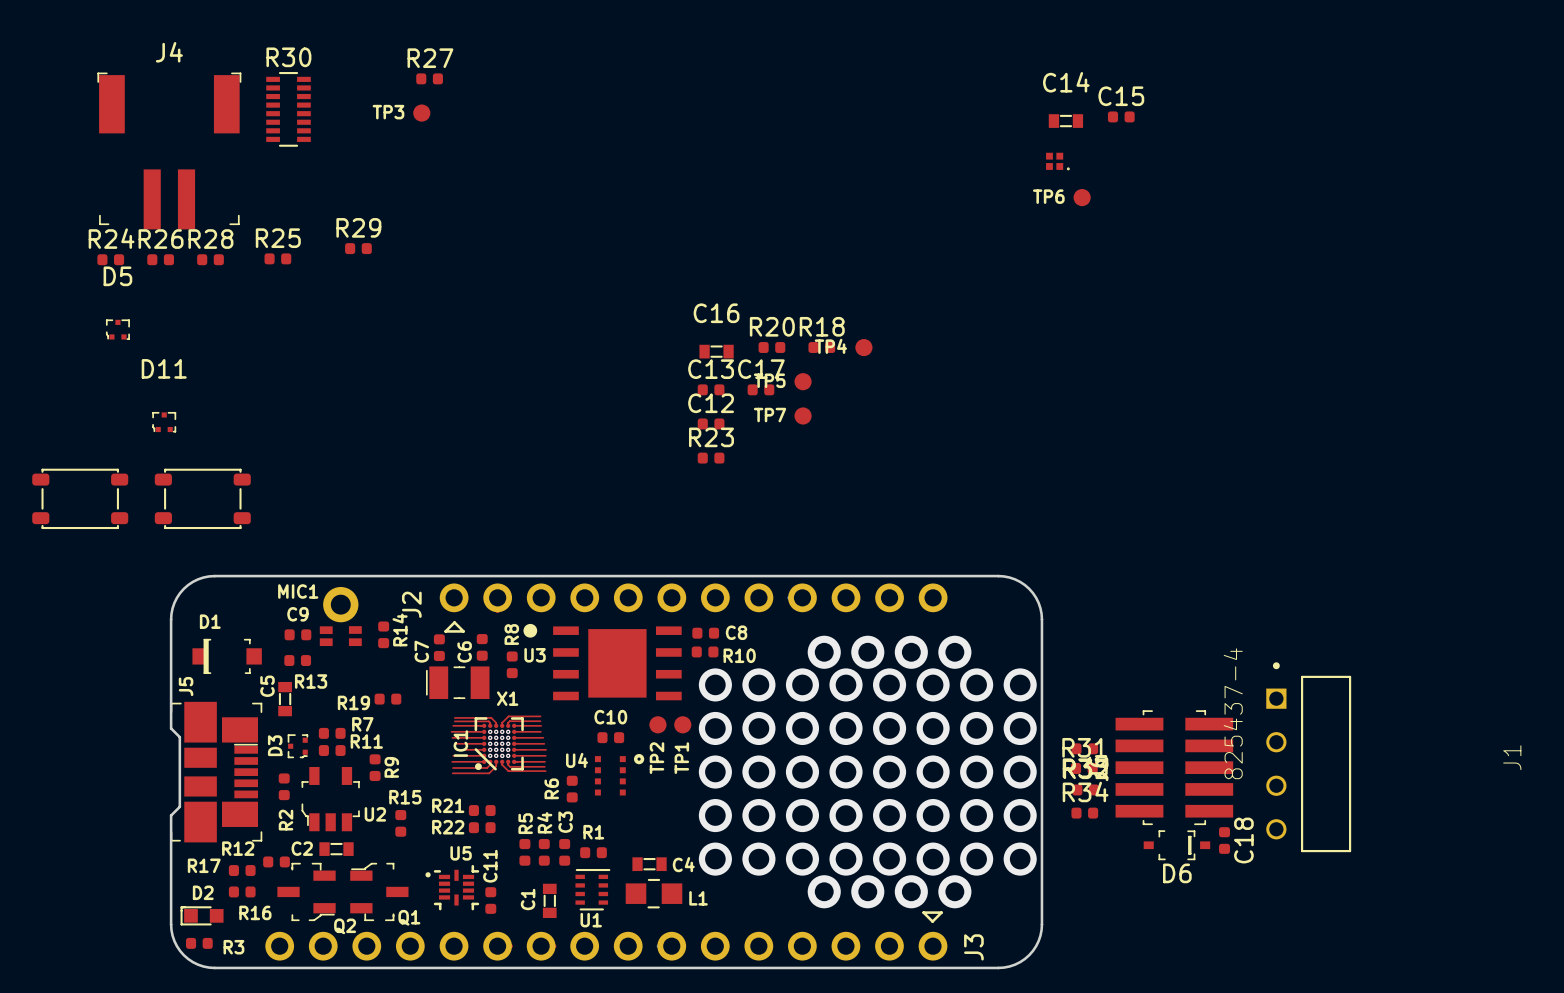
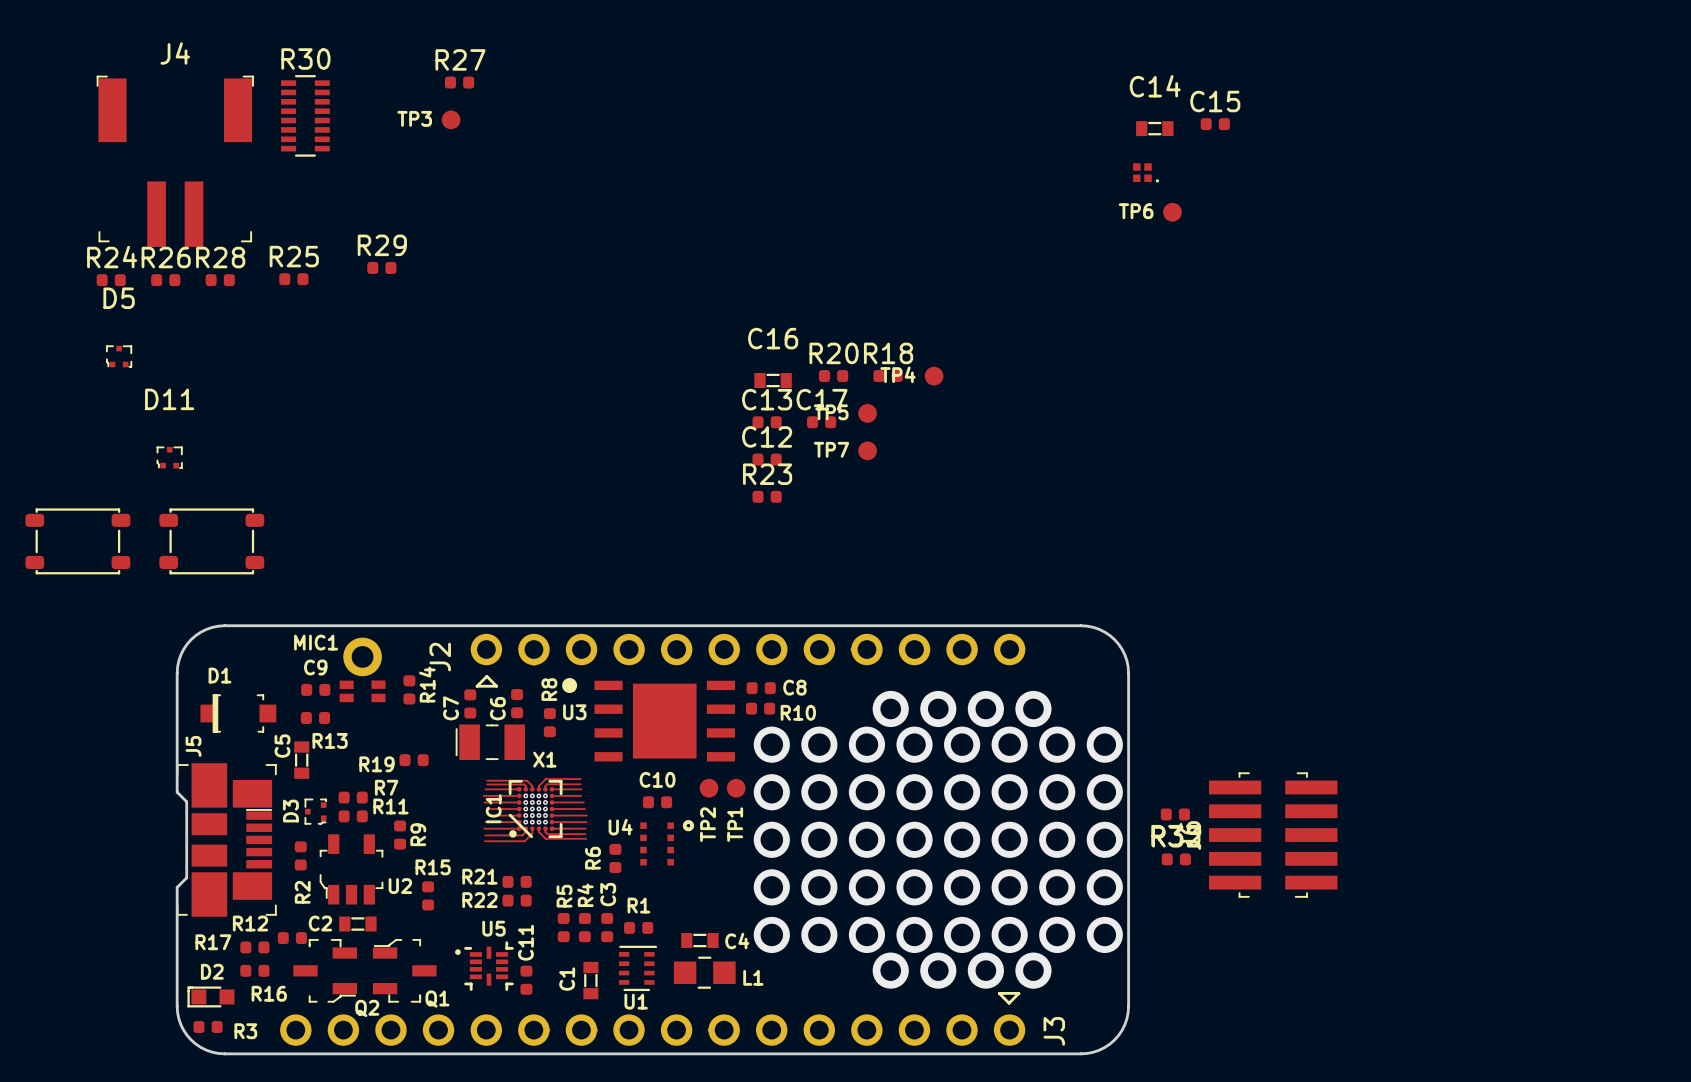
J1: 825437-4 (1308, 757) -> none
R31: (1084, 768) -> none
R34: (1084, 813) -> none
C18: (1224, 840) -> none
D6: (1176, 845) -> none

